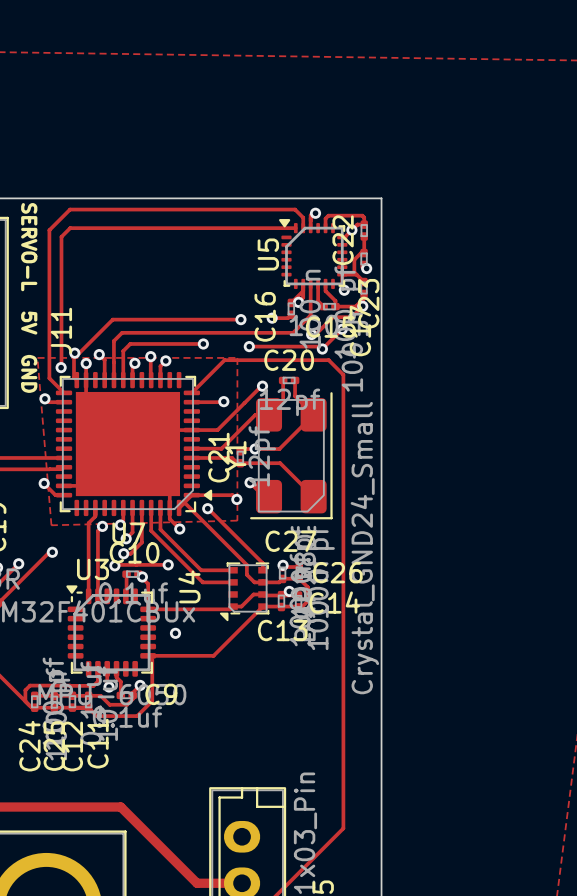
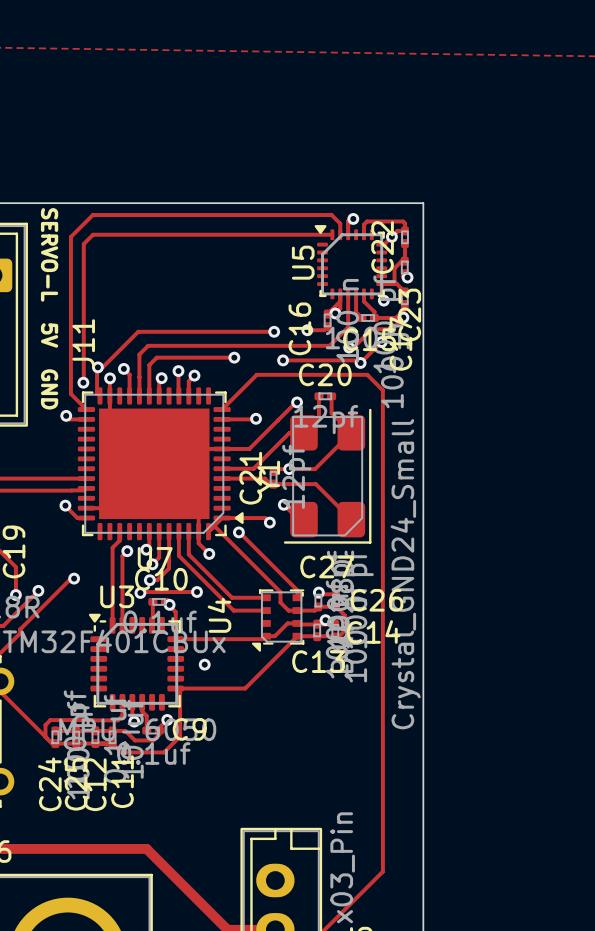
zone outline: (37, 357) (237, 357) (237, 520) (51, 525) (37, 357) -> none

